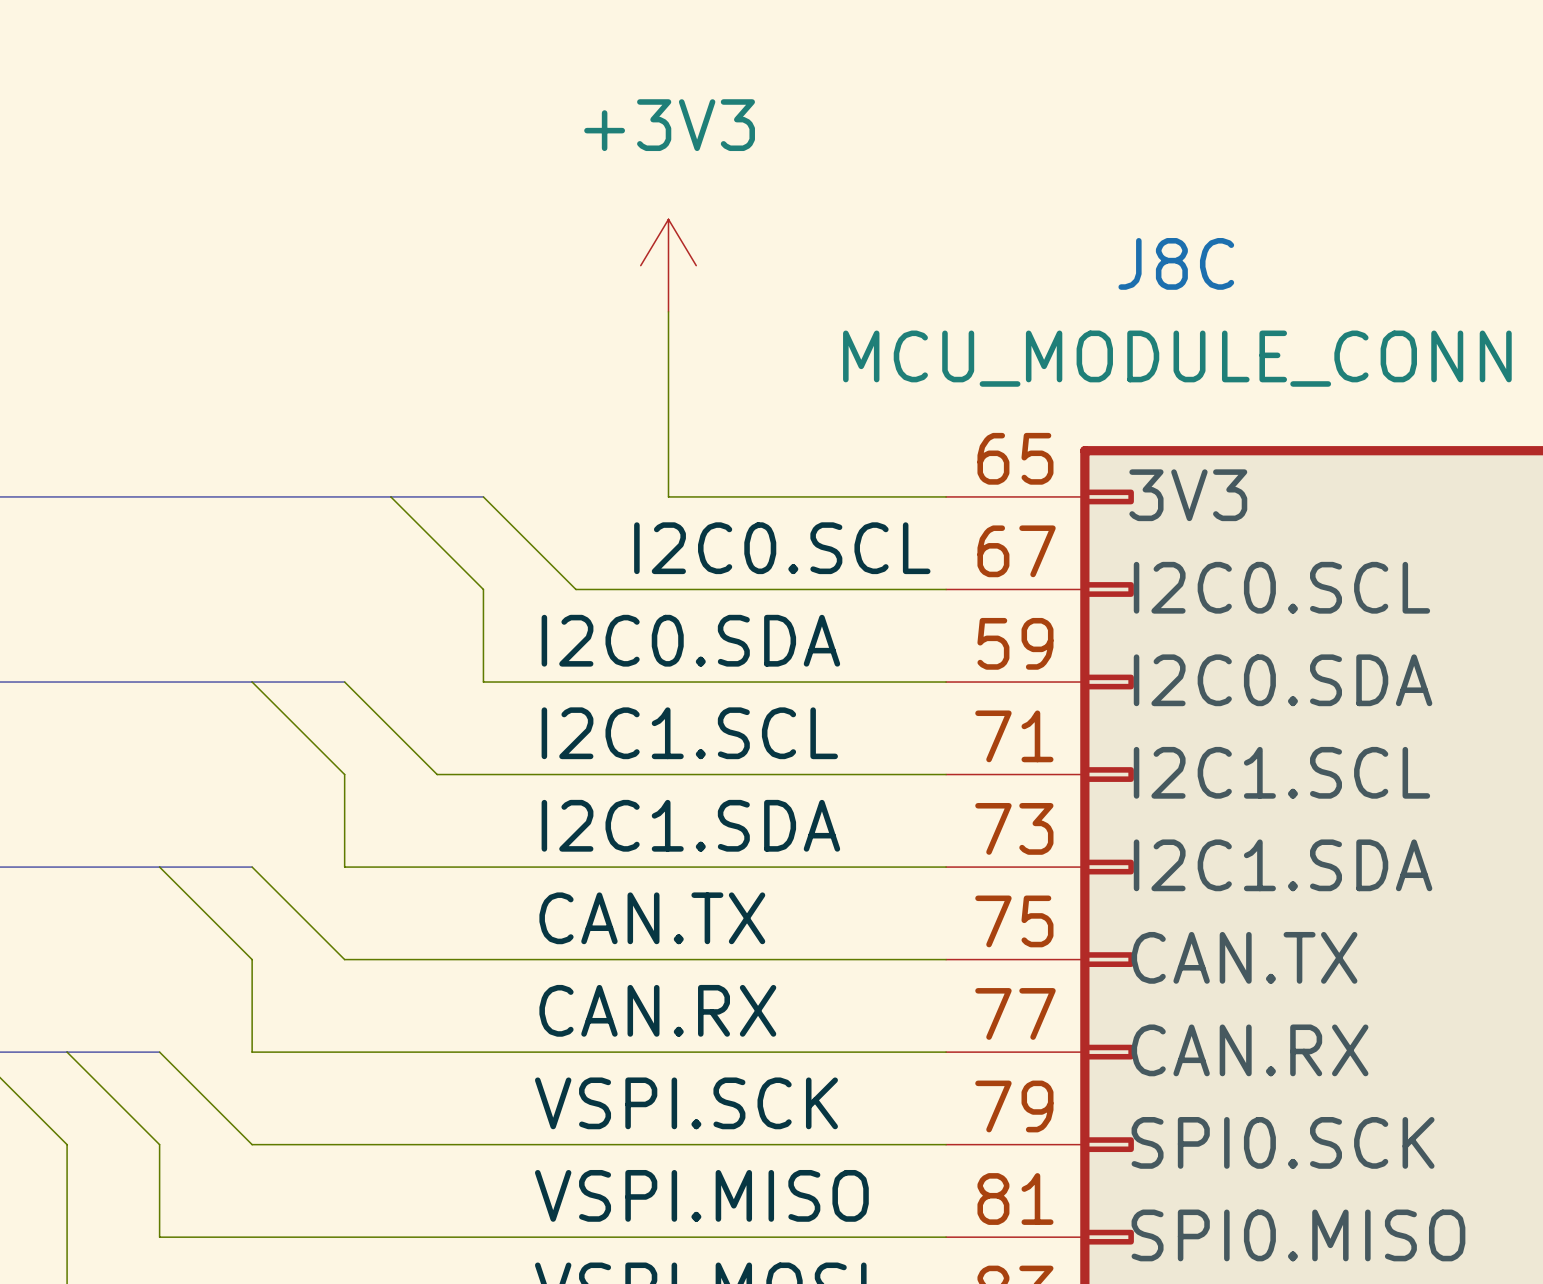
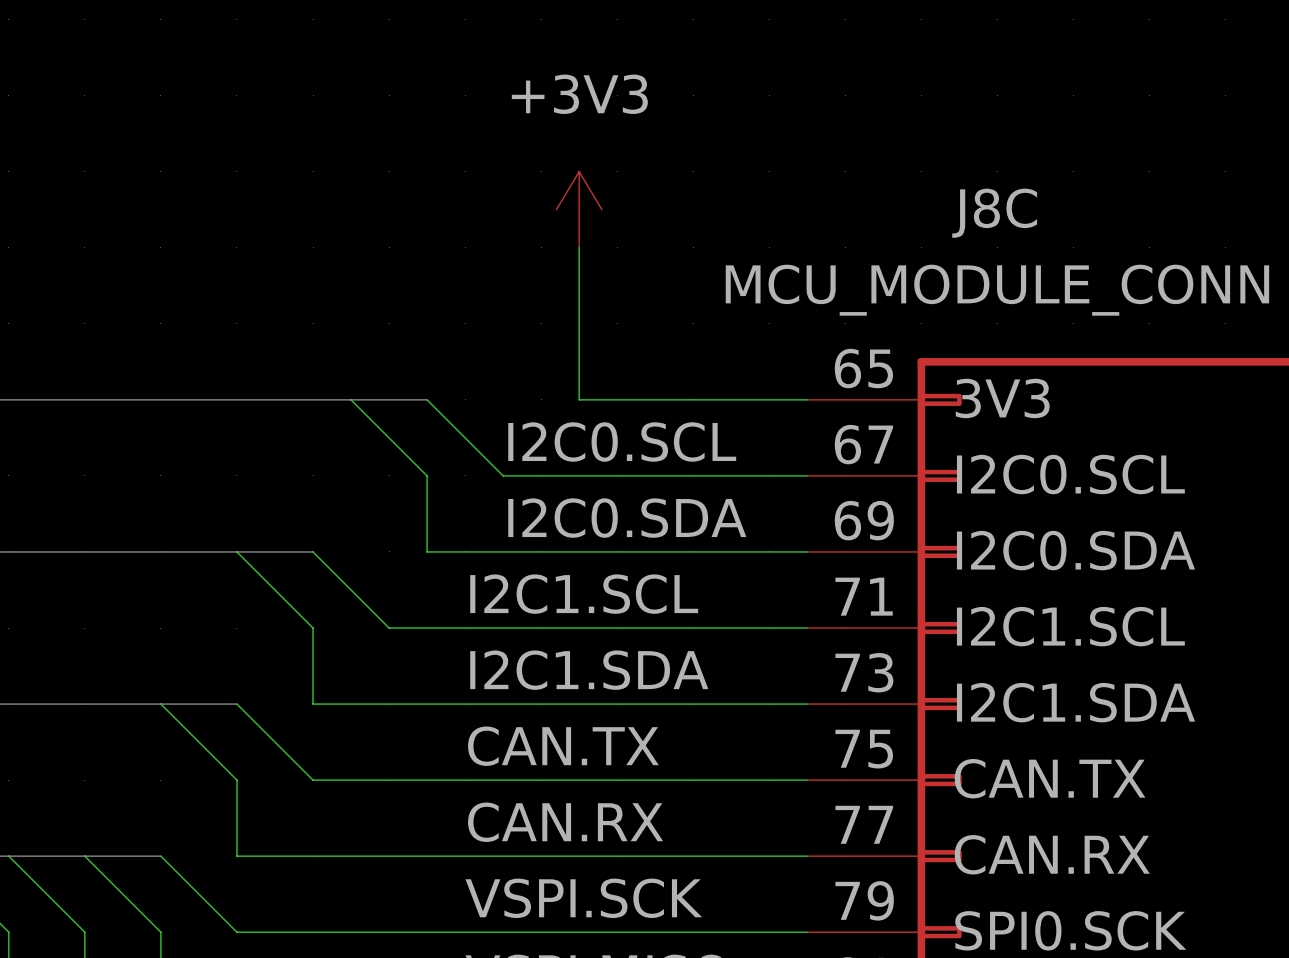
label position: I2C0.SCL (782, 548) -> I2C0.SCL (622, 442)
label position: I2C0.SDA (690, 640) -> I2C0.SDA (627, 518)
J8C pin number: 59 (1015, 643) -> 69 (864, 520)

